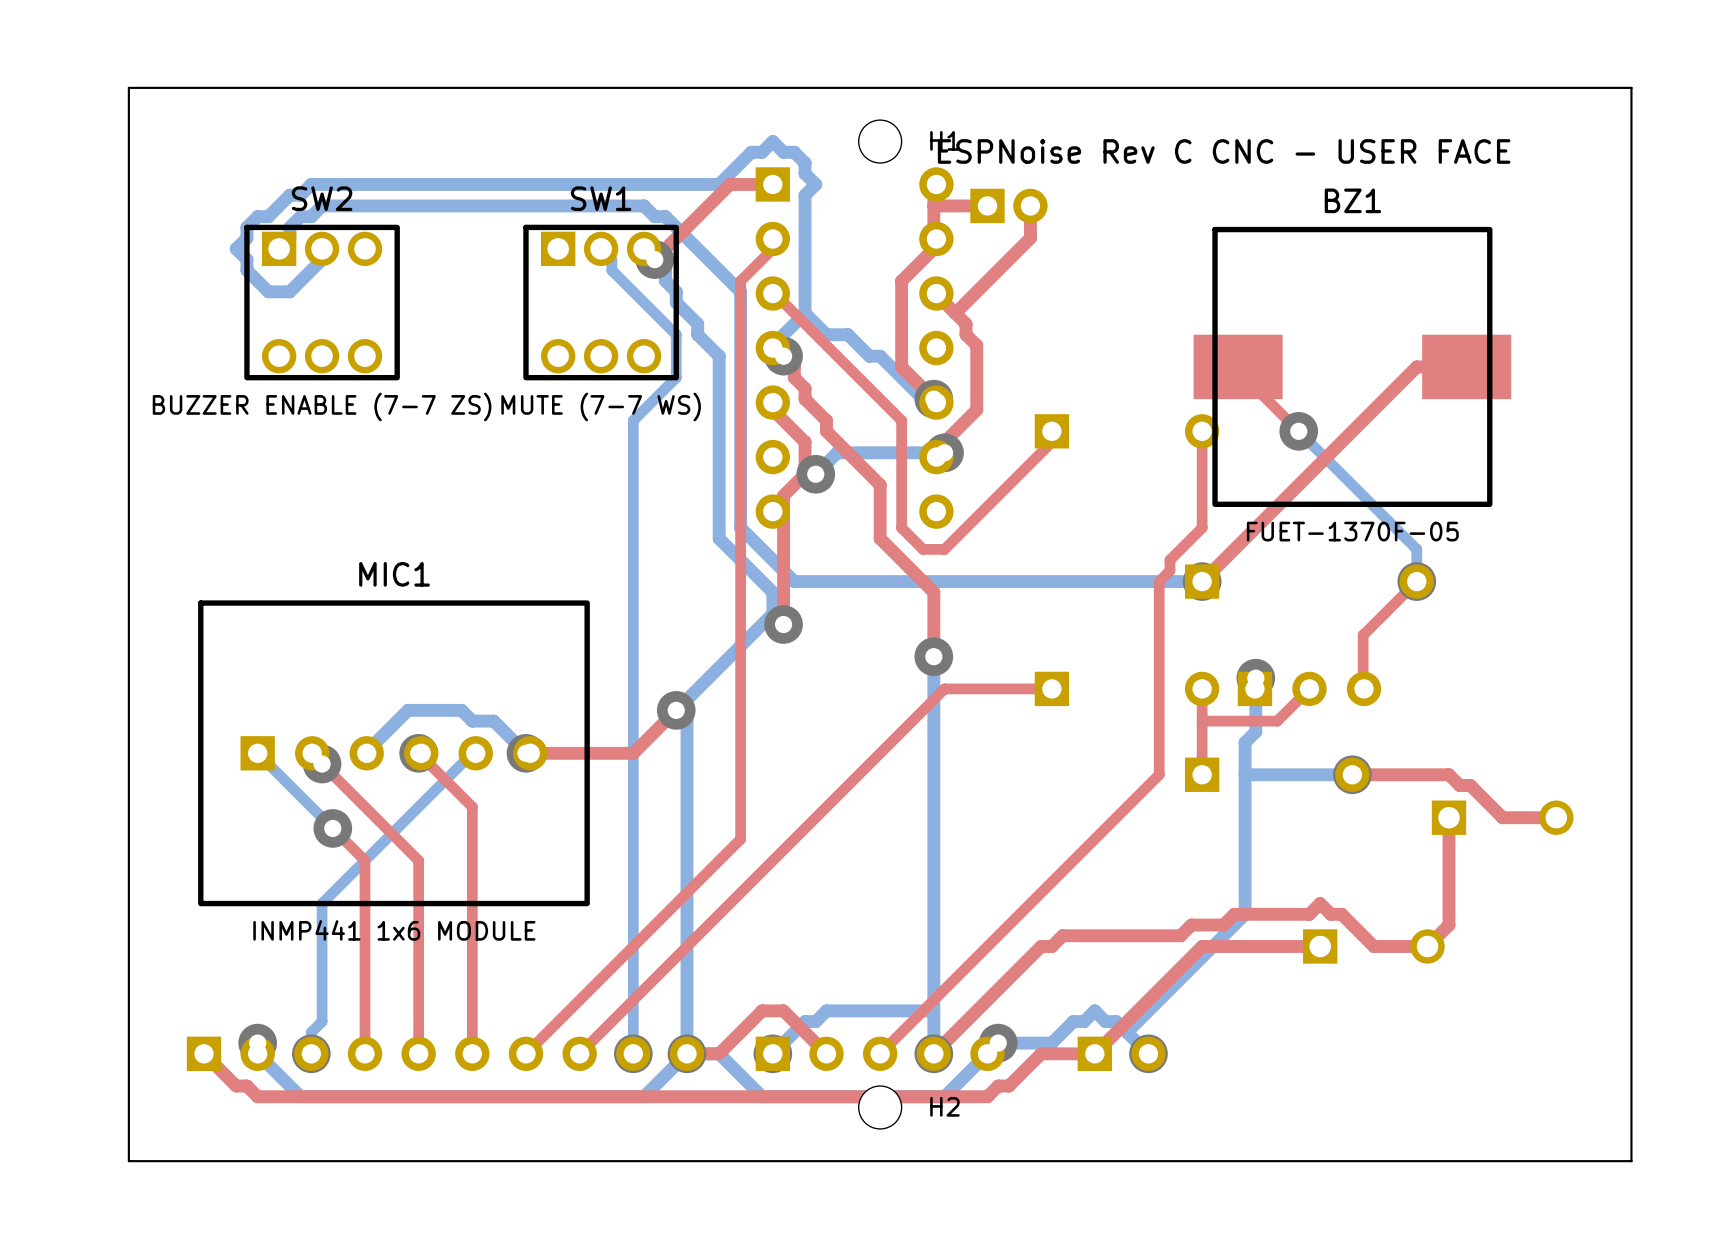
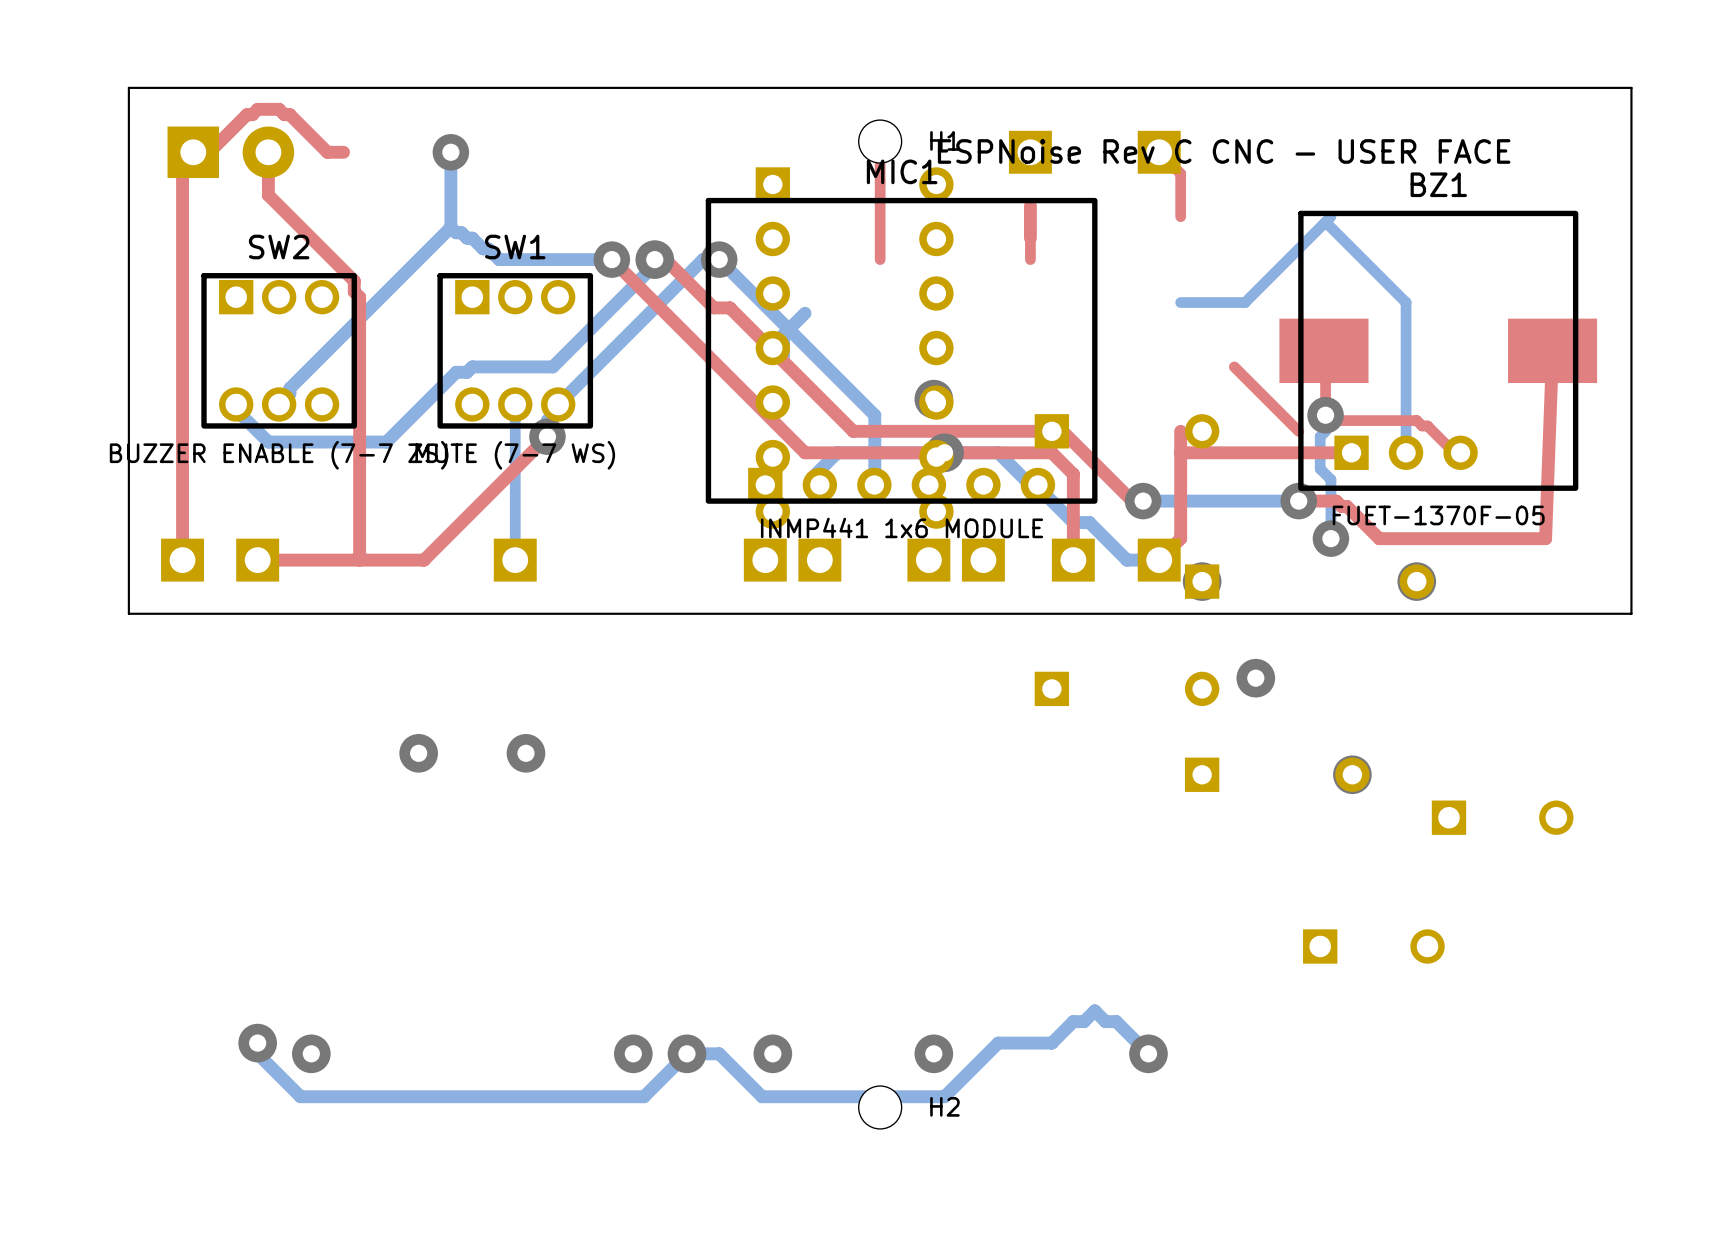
part: none -> (230, 152)
top track: none -> (268, 152) (268, 195) (354, 281) (354, 291) (359, 297) (359, 560)
top track: none -> (343, 152) (327, 152) (289, 114) (284, 114) (279, 109) (257, 109) (252, 114) (246, 114) (209, 152) (193, 152) (182, 163) (182, 560)
bottom track: none -> (450, 152) (450, 227)
via: none -> (450, 152)
top track: none -> (880, 152) (880, 259)
part: none -> (1030, 152)
top track: none -> (1159, 152) (1180, 173) (1180, 216)
part: none -> (1159, 152)
top track: (772, 184) (729, 184) (654, 259) -> none
top track: (933, 184) (933, 248) (901, 281) (901, 366) (933, 399) -> none
top track: (933, 205) (987, 205) -> none
part: (1008, 205) -> none
bottom track: none -> (1330, 216) (1245, 302) (1180, 302)
bottom track: none -> (1325, 222) (1406, 302) (1406, 452)
bottom track: none -> (450, 227) (289, 388) (289, 393) (279, 404)
bottom track: none -> (450, 227) (456, 232) (461, 232) (466, 238) (472, 238) (483, 248) (488, 248) (499, 259) (611, 259)
top track: (772, 238) (772, 248) (740, 281) (740, 839) (525, 1053) -> none
top track: (1030, 238) (955, 313) -> (1030, 238) (1030, 259)
bottom track: (279, 248) (289, 238) (289, 227) (300, 216) (311, 216) (322, 205) (644, 205) (654, 216) (665, 216) (740, 291) (740, 527) (794, 581) (1202, 581) -> none
bottom track: (322, 248) (322, 259) (289, 291) (268, 291) (246, 270) (246, 259) (236, 248) (246, 238) (246, 227) (257, 216) (268, 216) (289, 195) (300, 195) (311, 184) (719, 184) (751, 152) (762, 152) (772, 141) (783, 152) (794, 152) (805, 163) (805, 173) (815, 184) (805, 195) (805, 313) (826, 334) (847, 334) (869, 356) (880, 356) (923, 399) (933, 399) -> none
bottom track: (601, 248) (611, 259) (611, 270) (676, 334) (676, 377) (633, 420) (633, 1053) -> none
bottom track: (644, 248) (665, 270) (665, 281) (676, 291) (676, 302) (697, 324) (697, 334) (719, 356) (719, 538) (772, 592) (772, 613) -> none
bottom track: none -> (660, 254) (660, 259) (552, 366) (472, 366) (466, 372) (456, 372) (386, 442) (268, 442) (241, 415) (241, 409) (236, 404)
top track: none -> (660, 254) (713, 307) (729, 307) (853, 431) (1062, 431) (1132, 501) (1143, 501)
top track: none -> (611, 259) (805, 452) (933, 452)
via: none -> (611, 259)
via: none -> (719, 259)
top track: (772, 291) (901, 420) (901, 527) (923, 549) (944, 549) (1051, 442) (1051, 431) -> none
top track: (933, 291) (966, 324) (966, 334) (976, 345) (976, 409) (944, 442) (944, 452) -> (1073, 560) (1073, 474) (1051, 452) (944, 452)
SW2 position: (322, 302) -> (279, 350)
SW1 position: (601, 302) -> (515, 350)
top track: (772, 345) (794, 366) (794, 377) (805, 388) (805, 399) (826, 420) (826, 431) (880, 484) (880, 538) (933, 592) (933, 656) -> none
top track: none -> (1325, 350) (1325, 415) (1330, 420) (1416, 420) (1422, 425) (1427, 425) (1454, 452) (1459, 452)
top track: none -> (1552, 350) (1545, 538) (1379, 538) (1347, 506) (1341, 506) (1336, 501) (1298, 501)
via: (783, 356) -> none
BZ1 position: (1352, 366) -> (1438, 350)
top track: (1470, 366) (1416, 366) (1202, 581) -> none
top track: (772, 399) (772, 409) (805, 442) (805, 474) -> none
bottom track: none -> (515, 404) (515, 560)
bottom track: none -> (1325, 415) (1325, 431) (1320, 436) (1320, 468) (1330, 479) (1330, 538)
via: none -> (1325, 415)
top track: none -> (1180, 431) (1180, 538) (1159, 560)
top track: (1202, 431) (1202, 527) (1169, 560) (1169, 570) (1159, 581) (1159, 774) (880, 1053) -> none
bottom track: (1298, 431) (1416, 549) (1416, 581) -> none
via: (1298, 431) -> none
bottom track: none -> (547, 436) (547, 420) (552, 415) (552, 409) (703, 259) (719, 259) (874, 415) (874, 484)
top track: none -> (547, 436) (424, 560) (257, 560)
via: none -> (547, 436)
bottom track: none -> (944, 452) (998, 452) (1030, 484) (1035, 484) (1073, 522) (1089, 522) (1127, 560) (1159, 560)
top track: none -> (1180, 452) (1352, 452)
top track: (805, 474) (783, 495) (783, 624) -> none
via: (815, 474) -> none
bottom track: none -> (1143, 501) (1298, 501)
via: none -> (1143, 501)
via: none -> (1298, 501)
via: none -> (1330, 538)
part: none -> (182, 560)
part: none -> (257, 560)
part: none -> (515, 560)
part: none -> (765, 560)
part: none -> (819, 560)
part: none -> (928, 560)
part: none -> (983, 560)
part: none -> (1073, 560)
part: none -> (1159, 560)
top track: (1416, 581) (1363, 635) (1363, 688) -> none
MIC1 footprint: [198, 600, 590, 907] -> [705, 197, 1098, 504]
board edge: (128, 613) (128, 1161) (1631, 1161) (1631, 613) -> (128, 613) (1631, 613)
bottom track: (772, 613) (676, 710) (686, 721) (686, 1053) -> none
via: (783, 624) -> none
bottom track: (933, 656) (933, 1053) -> none
via: (933, 656) -> none
bottom track: (1255, 678) (1255, 731) (1245, 742) (1245, 914) (1127, 1032) -> none
top track: (1051, 688) (944, 688) (579, 1053) -> none
top track: (1202, 688) (1202, 774) -> none
top track: (1309, 688) (1277, 721) (1202, 721) -> none
part position: (1309, 688) -> (1406, 452)
top track: (676, 710) (633, 753) (525, 753) -> none
via: (676, 710) -> none
bottom track: (257, 753) (332, 828) -> none
bottom track: (365, 753) (407, 710) (461, 710) (472, 721) (493, 721) (525, 753) -> none
top track: (418, 753) (472, 806) (472, 1053) -> none
bottom track: (472, 753) (322, 903) (322, 1021) (311, 1032) (311, 1053) -> none
top track: (322, 764) (418, 860) (418, 1053) -> none
via: (322, 764) -> none
bottom track: (1245, 774) (1352, 774) -> none
top track: (1352, 774) (1448, 774) (1459, 785) (1470, 785) (1502, 817) (1556, 817) -> none
top track: (1448, 817) (1448, 925) (1427, 946) (1373, 946) (1341, 914) (1330, 914) (1320, 903) (1309, 914) (1234, 914) (1223, 925) (1191, 925) (1180, 935) (1062, 935) (1051, 946) (1041, 946) (933, 1053) -> none
top track: (332, 828) (365, 860) (365, 1053) -> none
via: (332, 828) -> none
top track: (1320, 946) (1202, 946) (1094, 1053) (1041, 1053) (1008, 1086) (998, 1086) (987, 1096) (257, 1096) (246, 1086) (236, 1086) (204, 1053) -> none
bottom track: (933, 1010) (826, 1010) (815, 1021) (805, 1021) (772, 1053) -> none
via: (998, 1043) -> none
part: (445, 1053) -> none
top track: (686, 1053) (719, 1053) (762, 1010) (783, 1010) (826, 1053) -> none
part: (880, 1053) -> none
part: (1121, 1053) -> none

